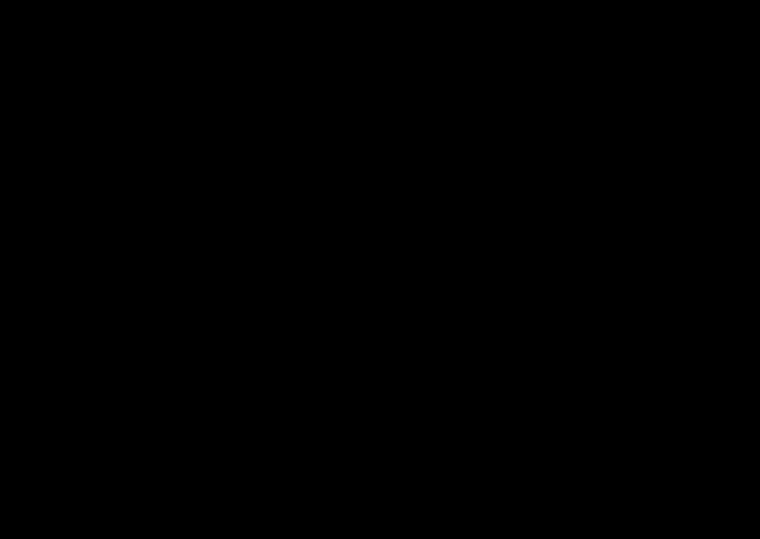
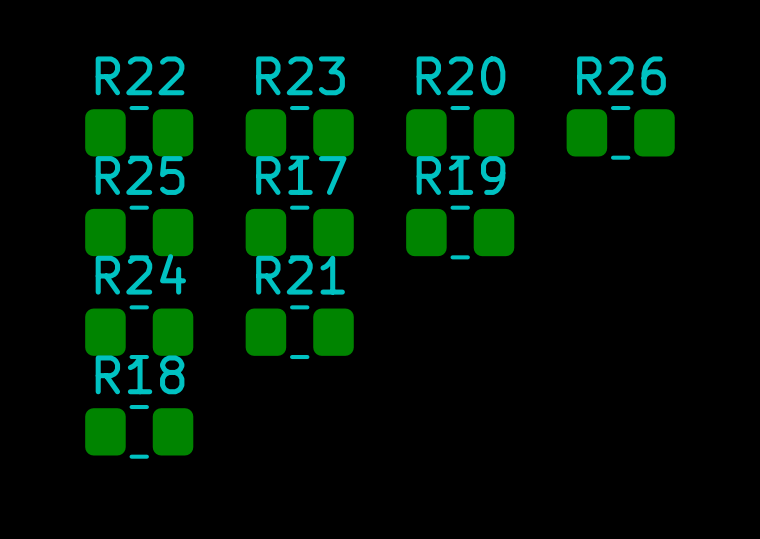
R22: none -> (139, 132)
R23: none -> (299, 132)
R20: none -> (460, 132)
R26: none -> (620, 132)
R25: none -> (139, 232)
R17: none -> (299, 232)
R19: none -> (460, 232)
R24: none -> (139, 332)
R21: none -> (299, 332)
R18: none -> (139, 431)

